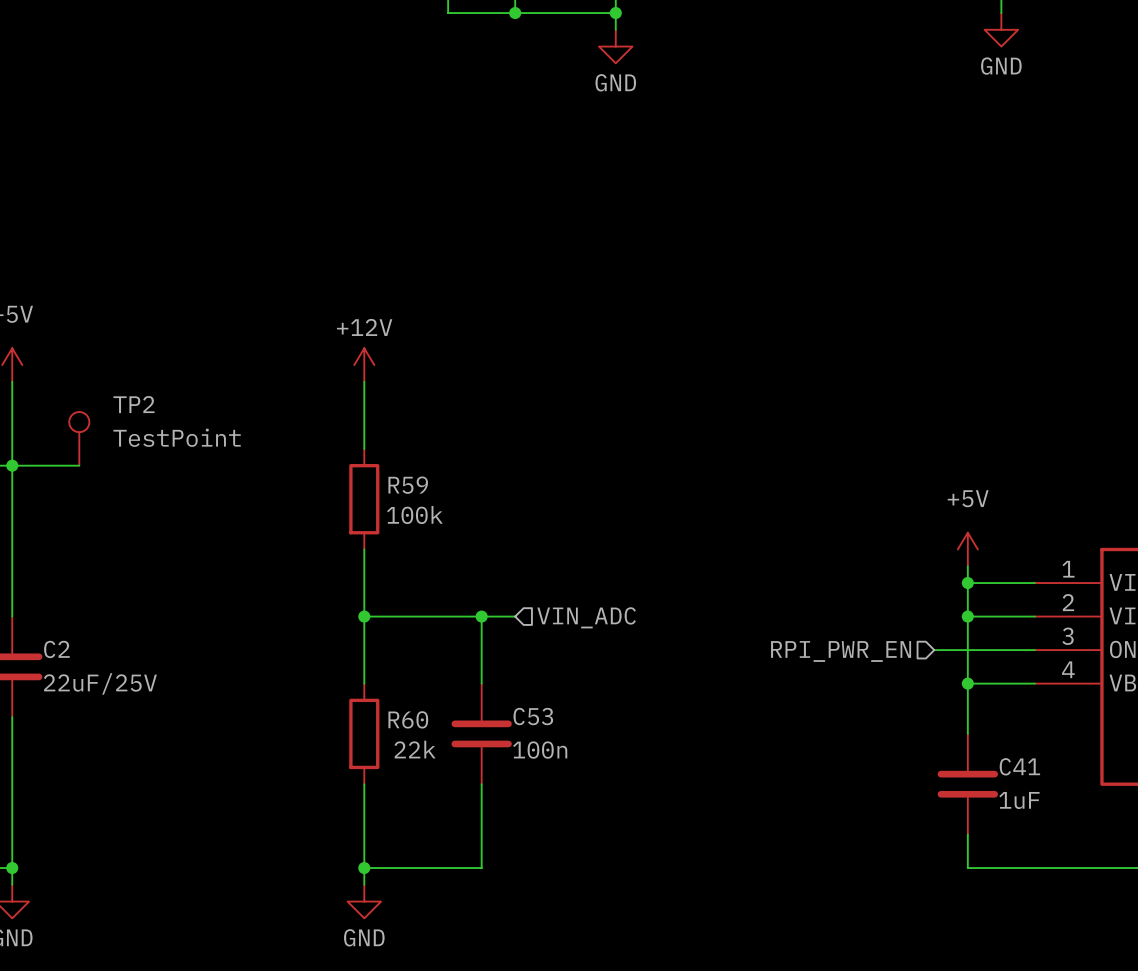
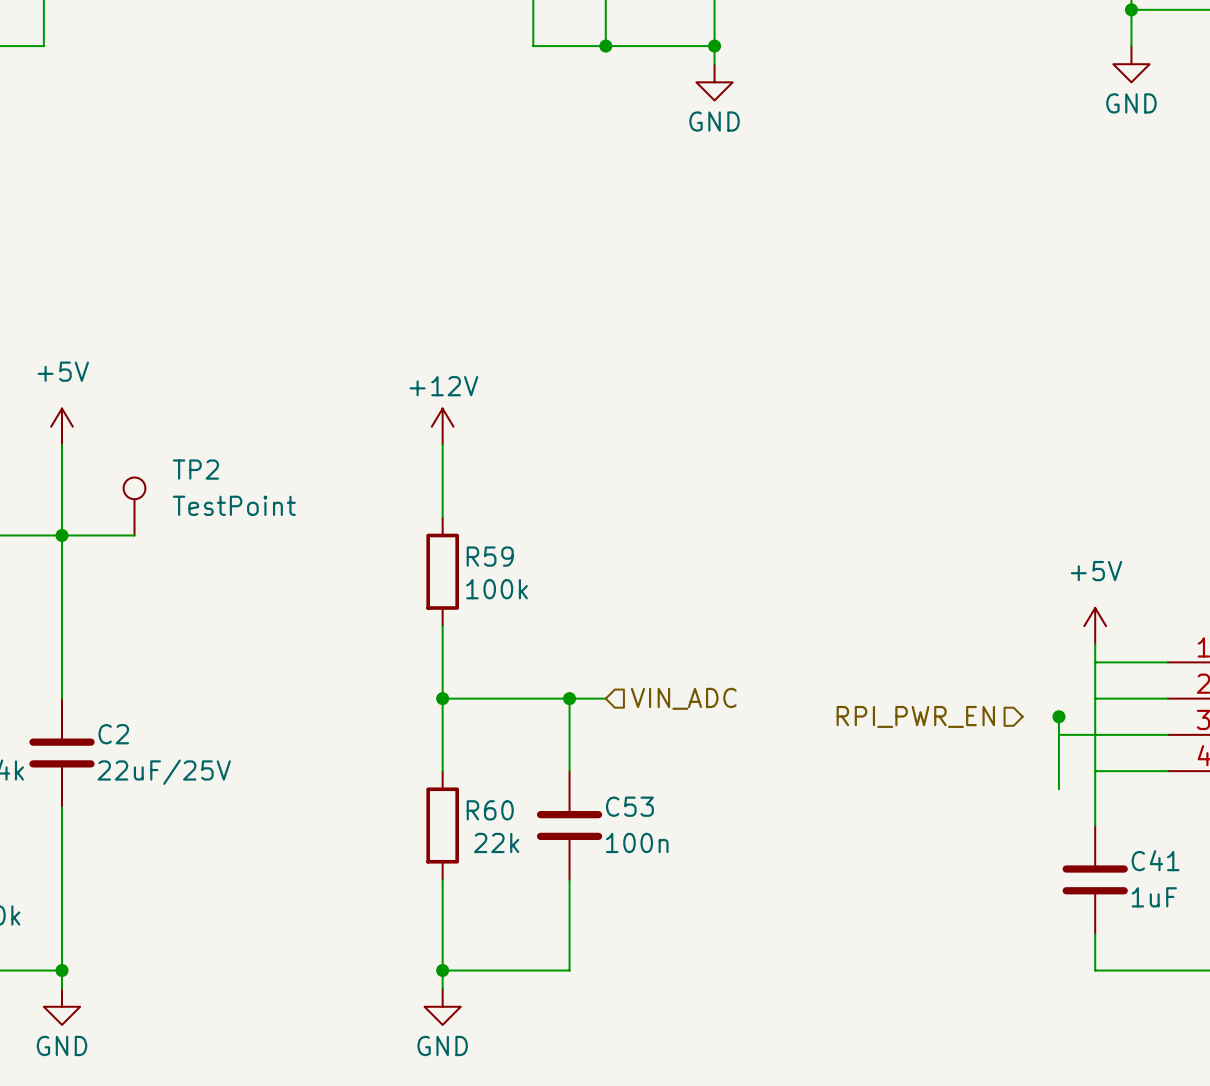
junction: (967, 583) -> none
junction: (967, 616) -> none
wire: none -> (1058, 716) (1058, 789)
junction: none -> (1058, 716)
hierarchical label position: RPI_PWR_EN (841, 651) -> RPI_PWR_EN (915, 716)
junction: (967, 683) -> none

